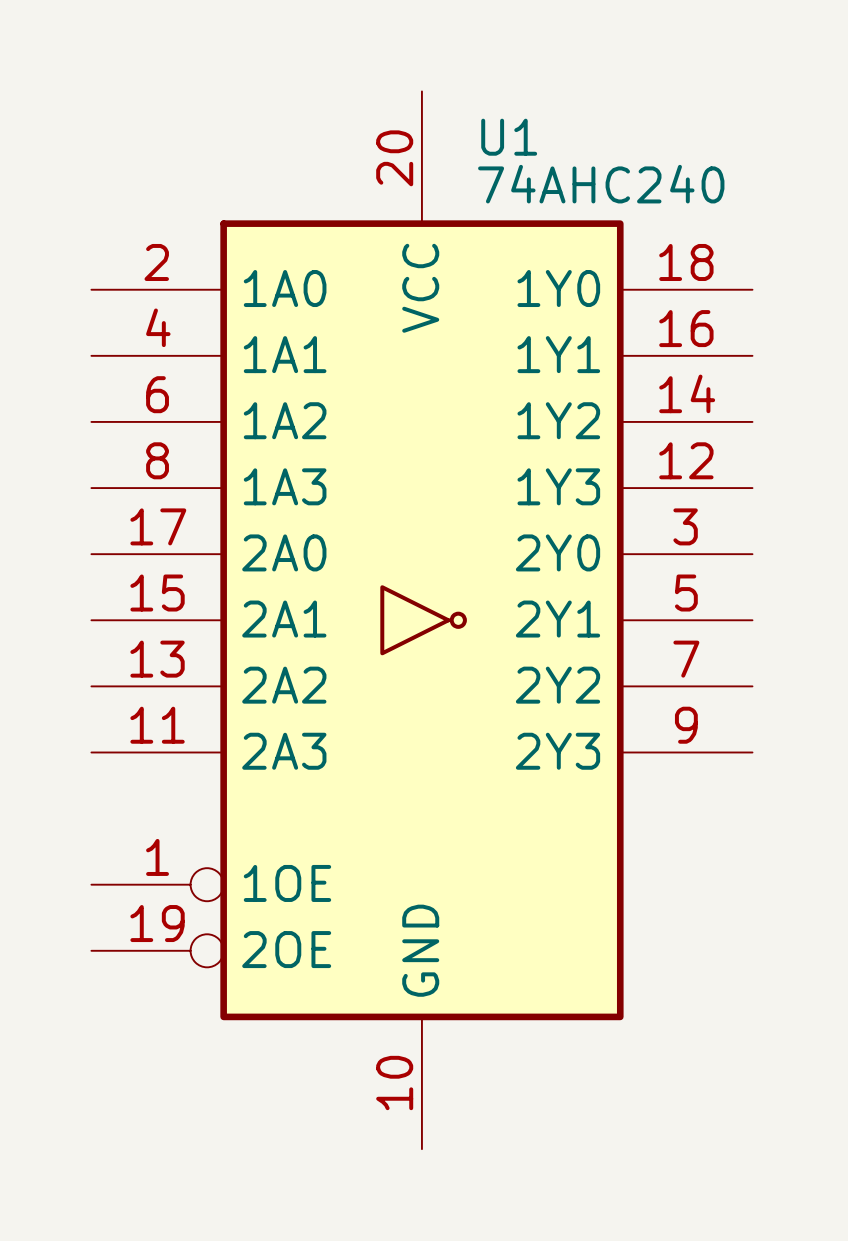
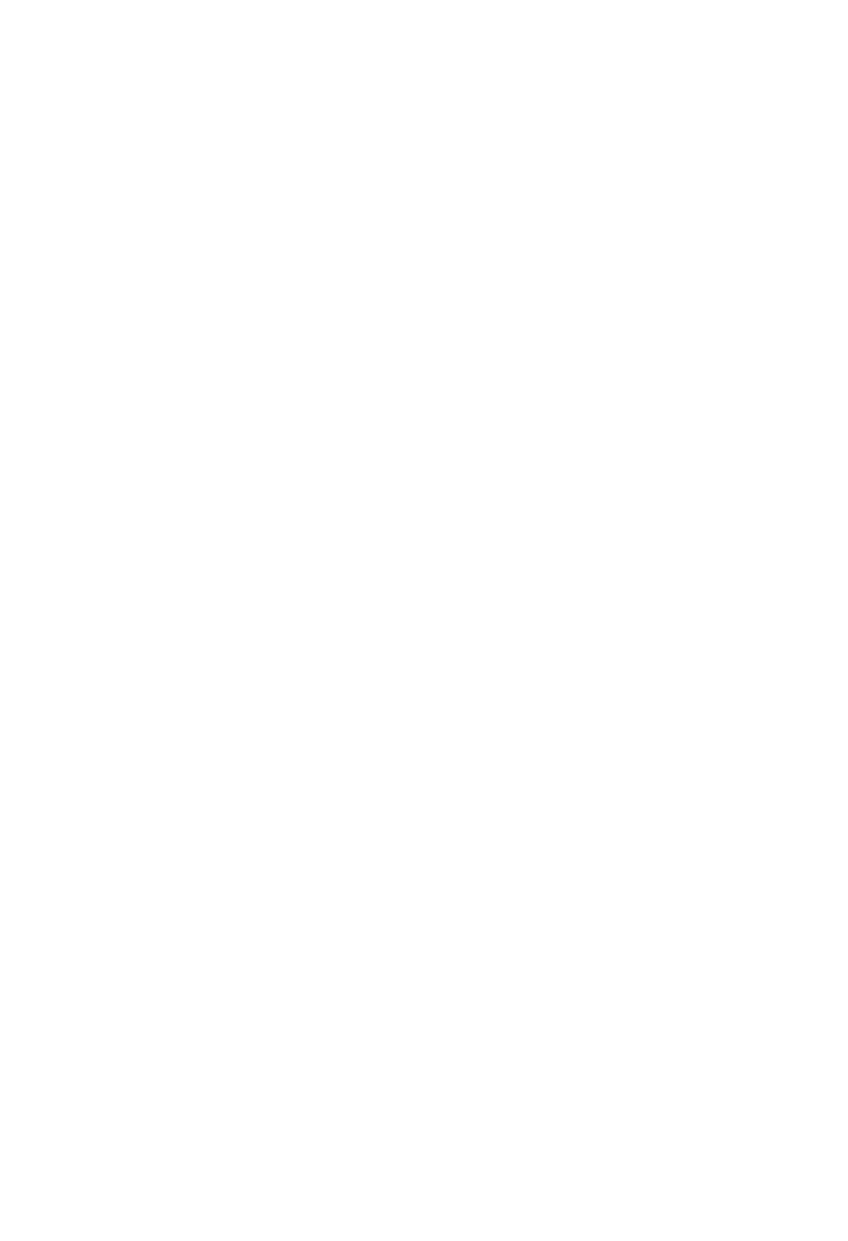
U1: 74AHC240 (421, 620) -> none

